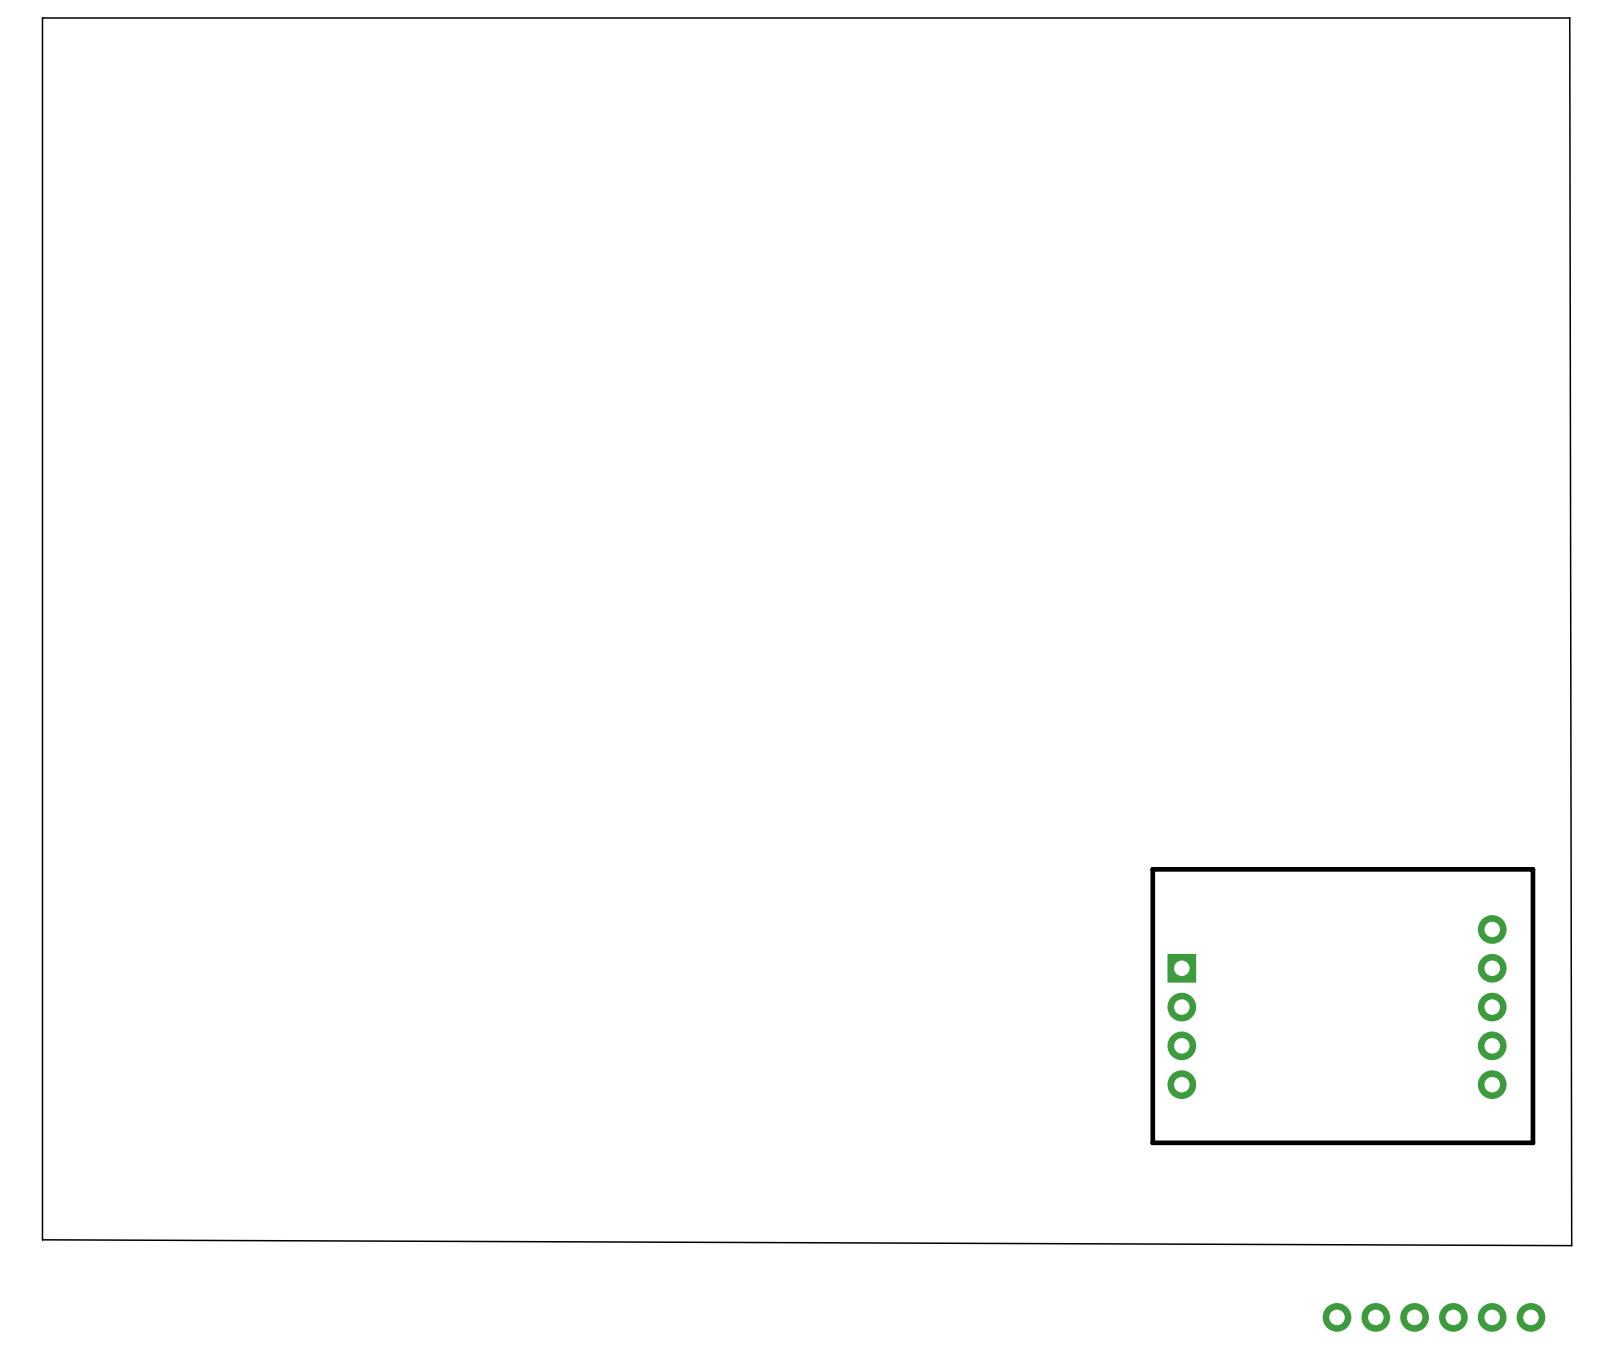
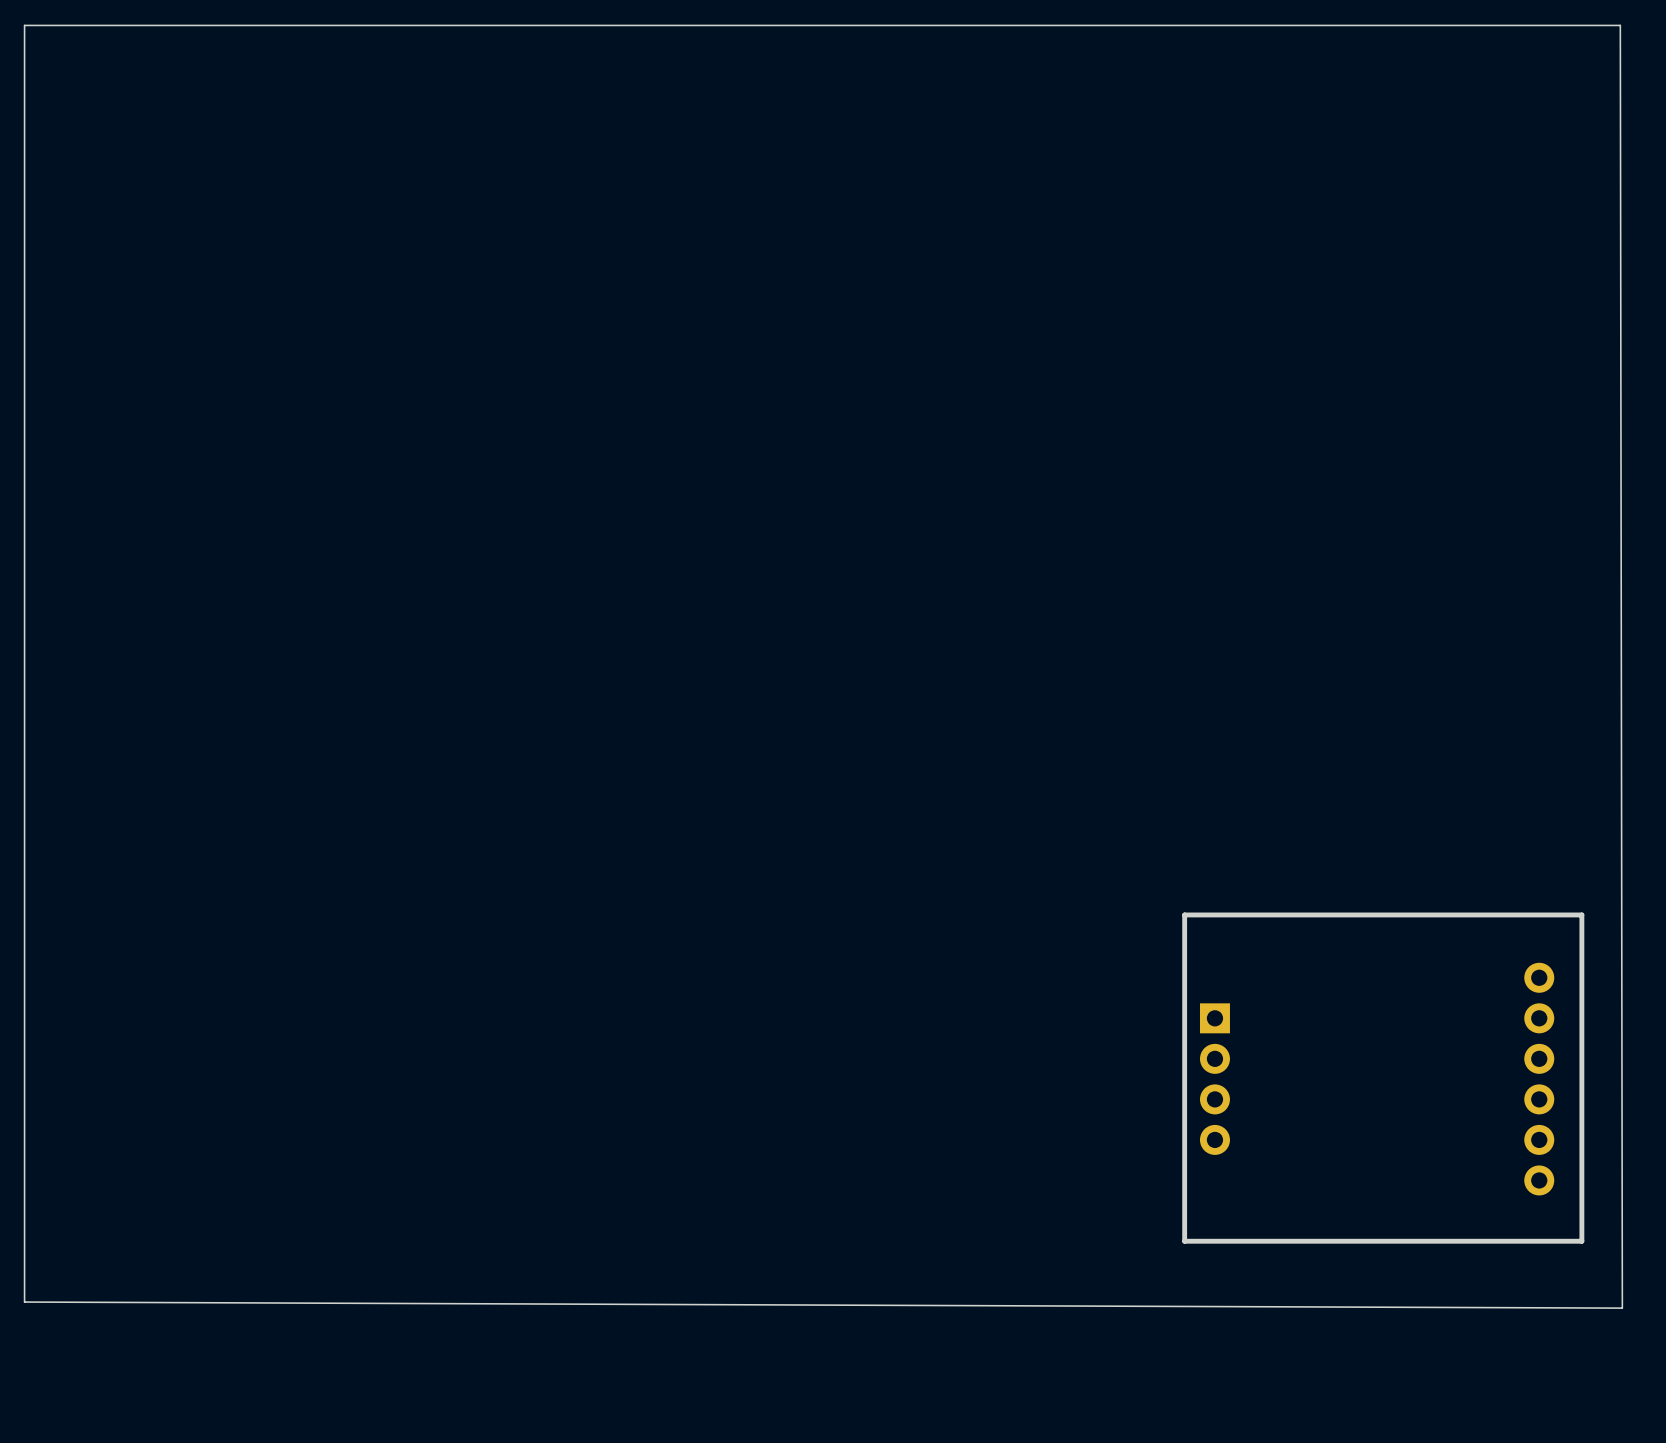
board edge: (1532, 1142) (1152, 1142) -> (1581, 1200) (1581, 1241) (1184, 1241) (1184, 1200)
part rotation: 0° (1433, 1317) -> 90° clockwise (1539, 1079)
part position: (1433, 1317) -> (1539, 1079)

